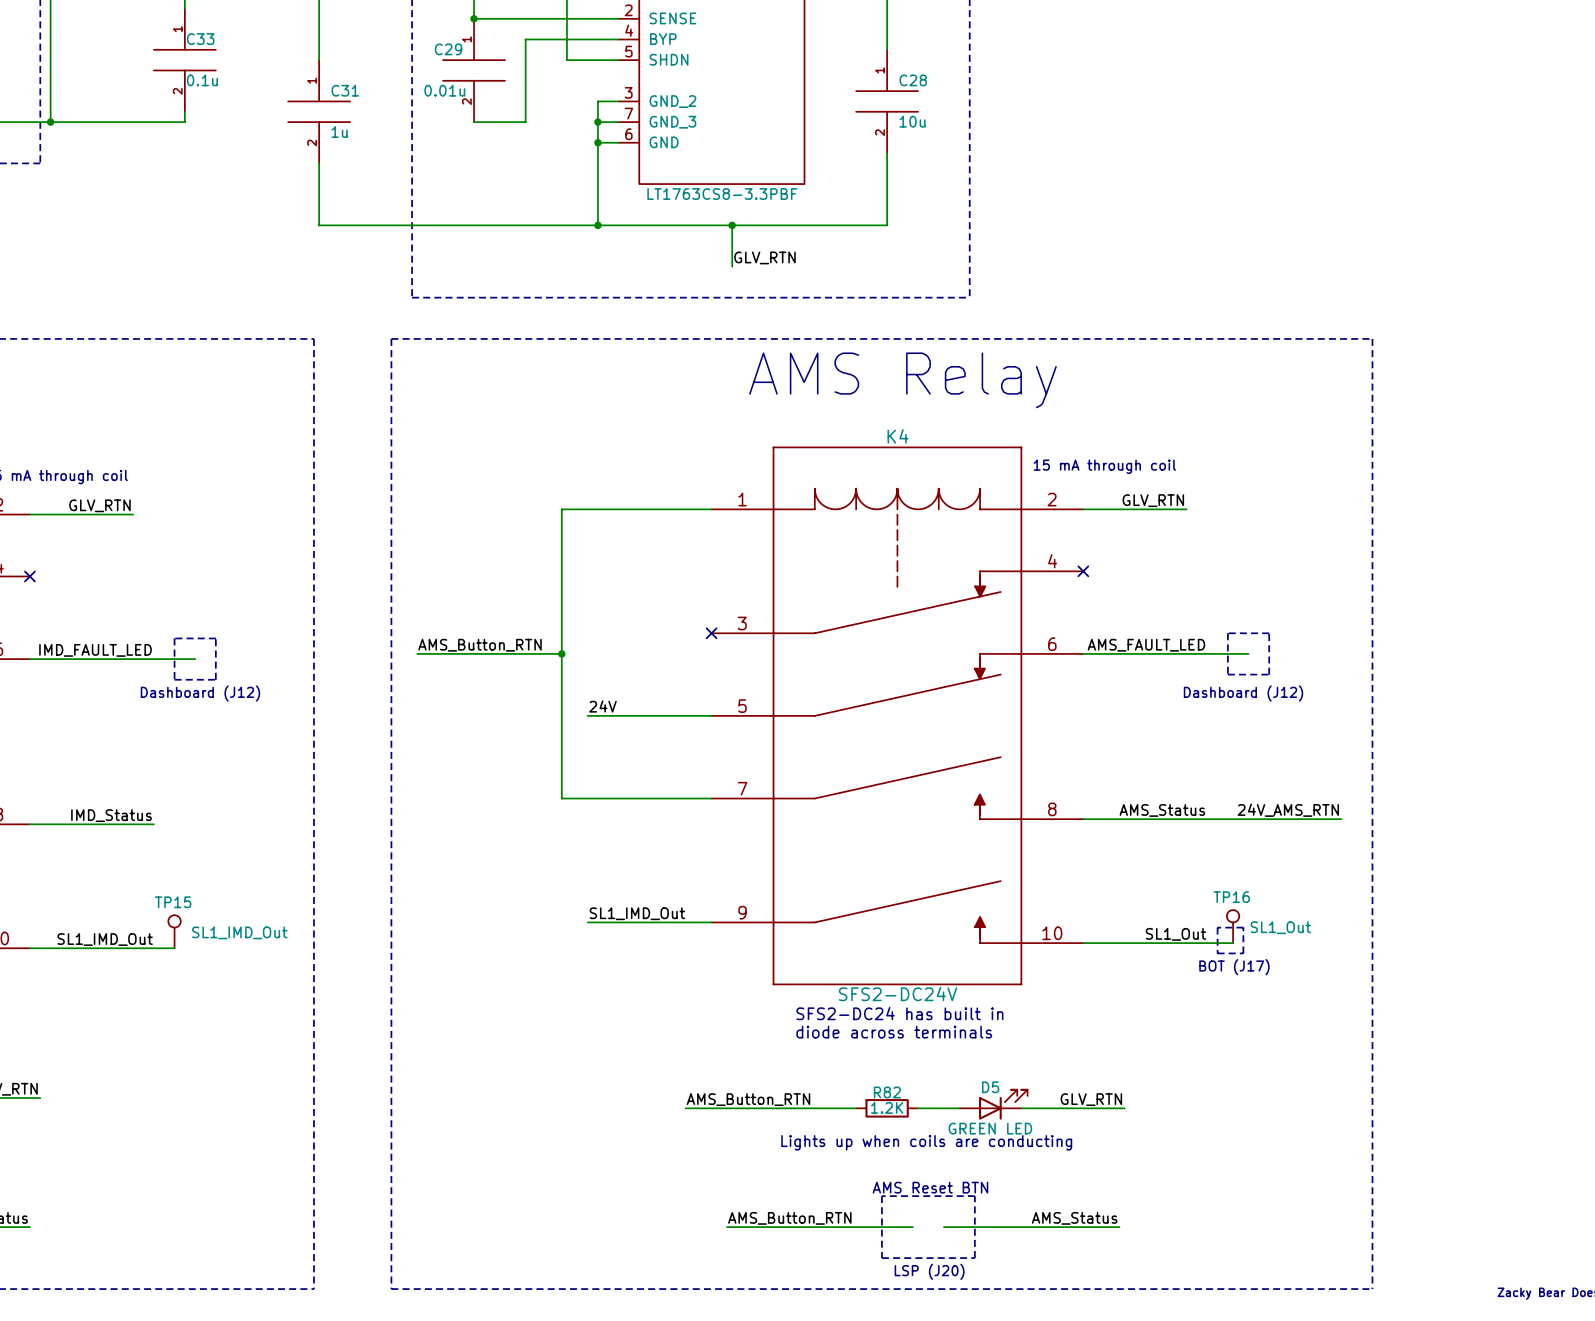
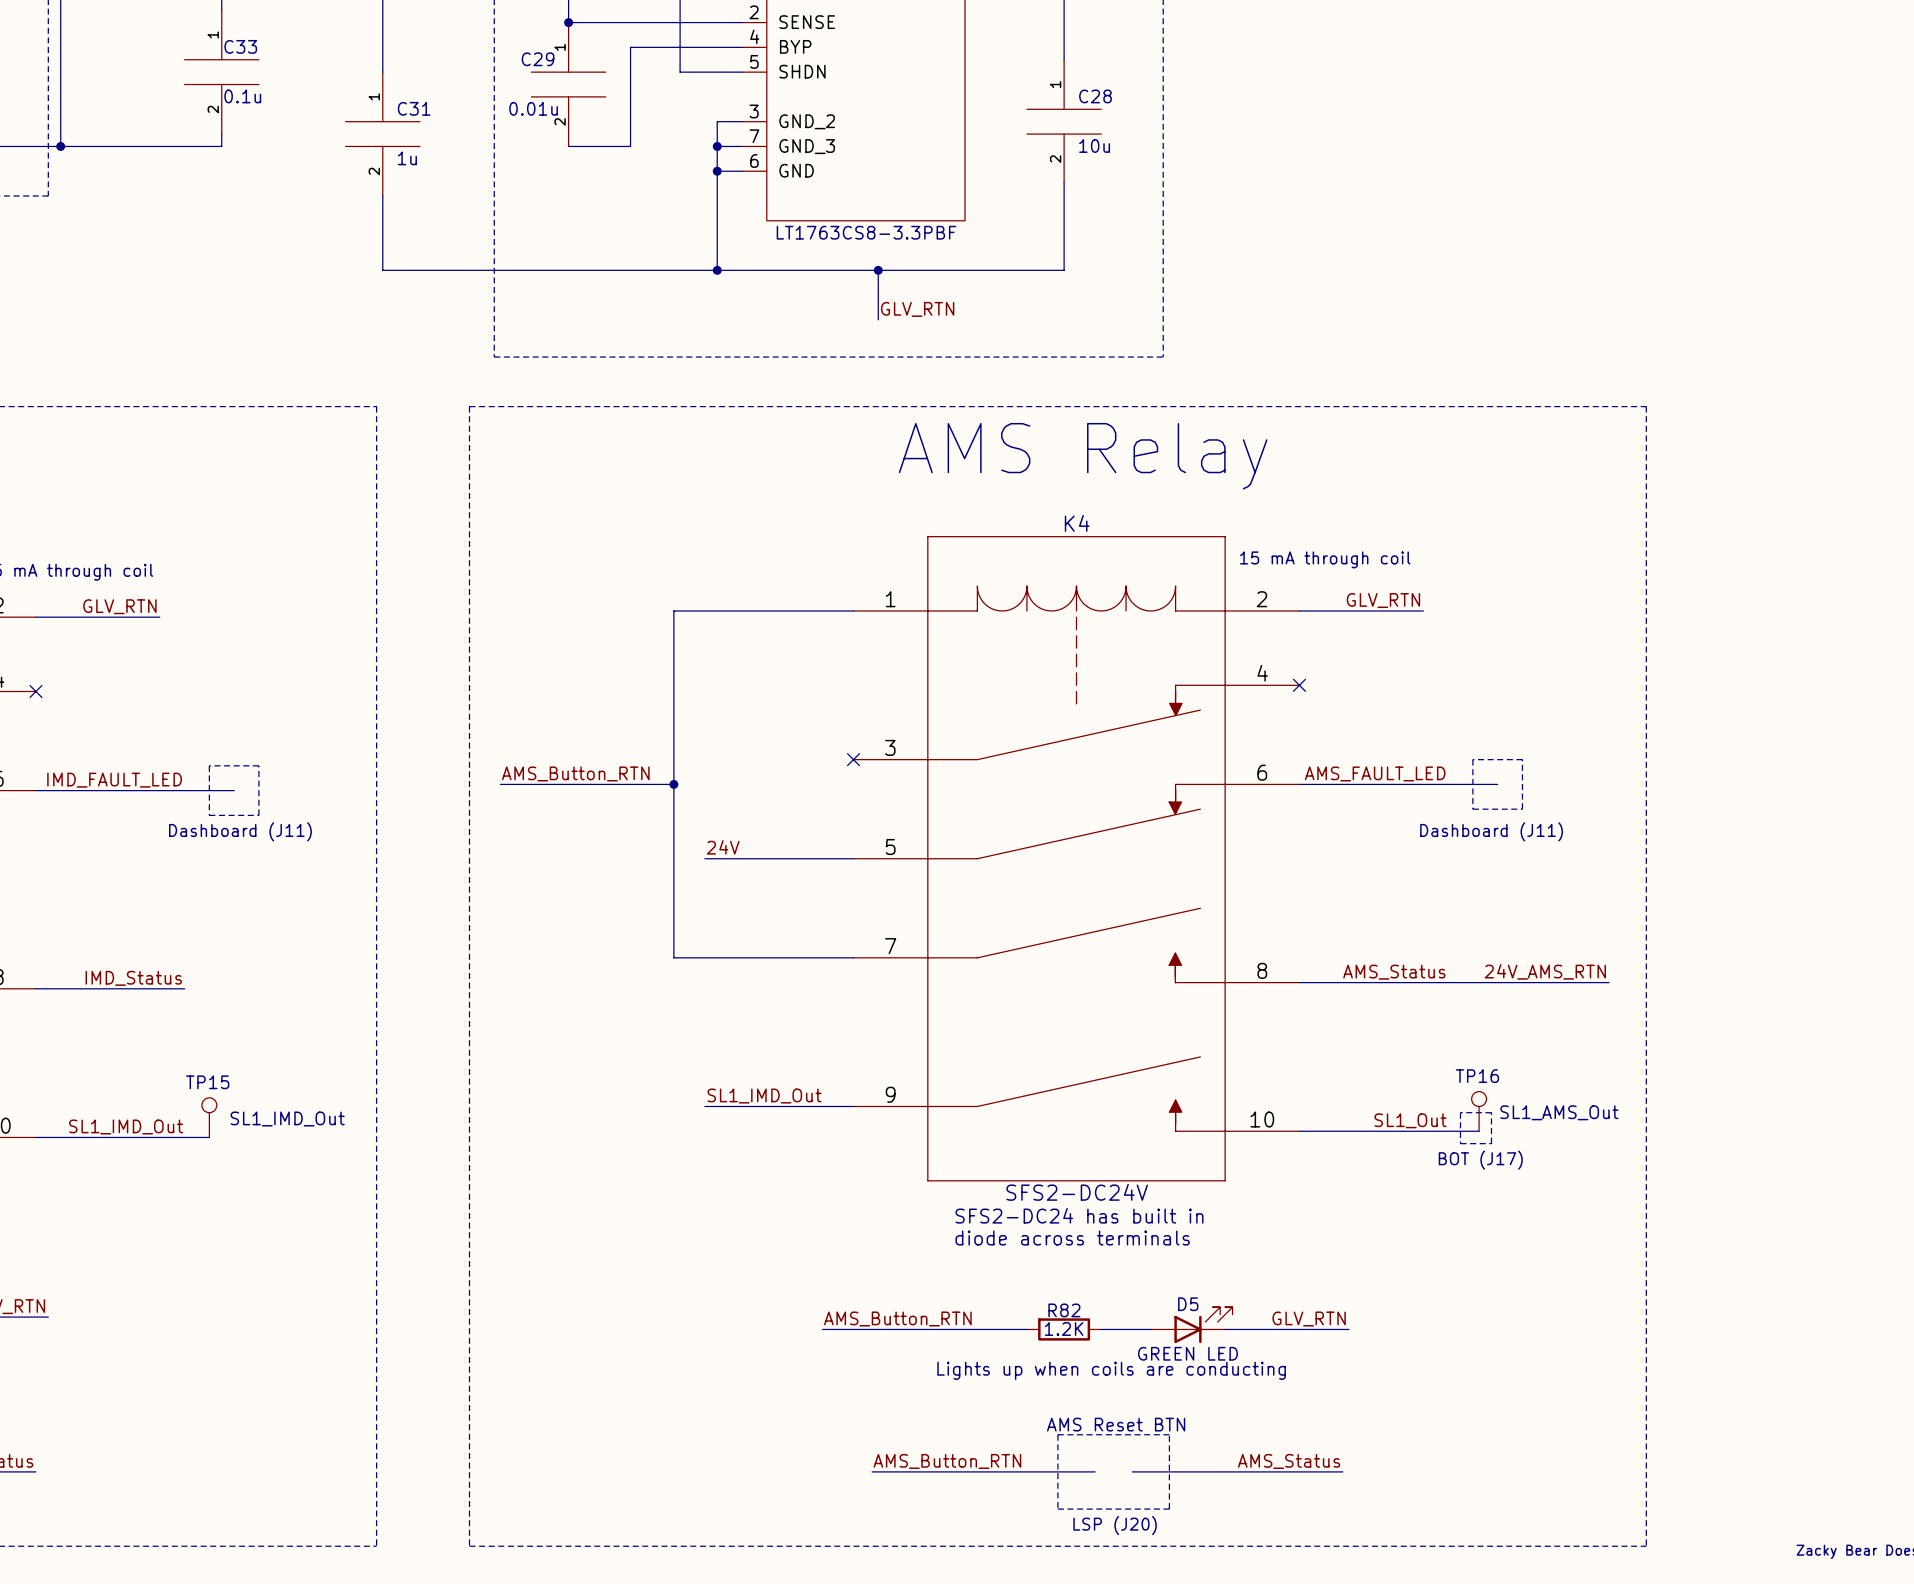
text: Dashboard (J12) (200, 693) -> Dashboard (J11) (240, 831)
text: Dashboard (J12) (1243, 693) -> Dashboard (J11) (1491, 831)
TP16 value: SL1_Out (1280, 927) -> SL1_AMS_Out (1559, 1112)

